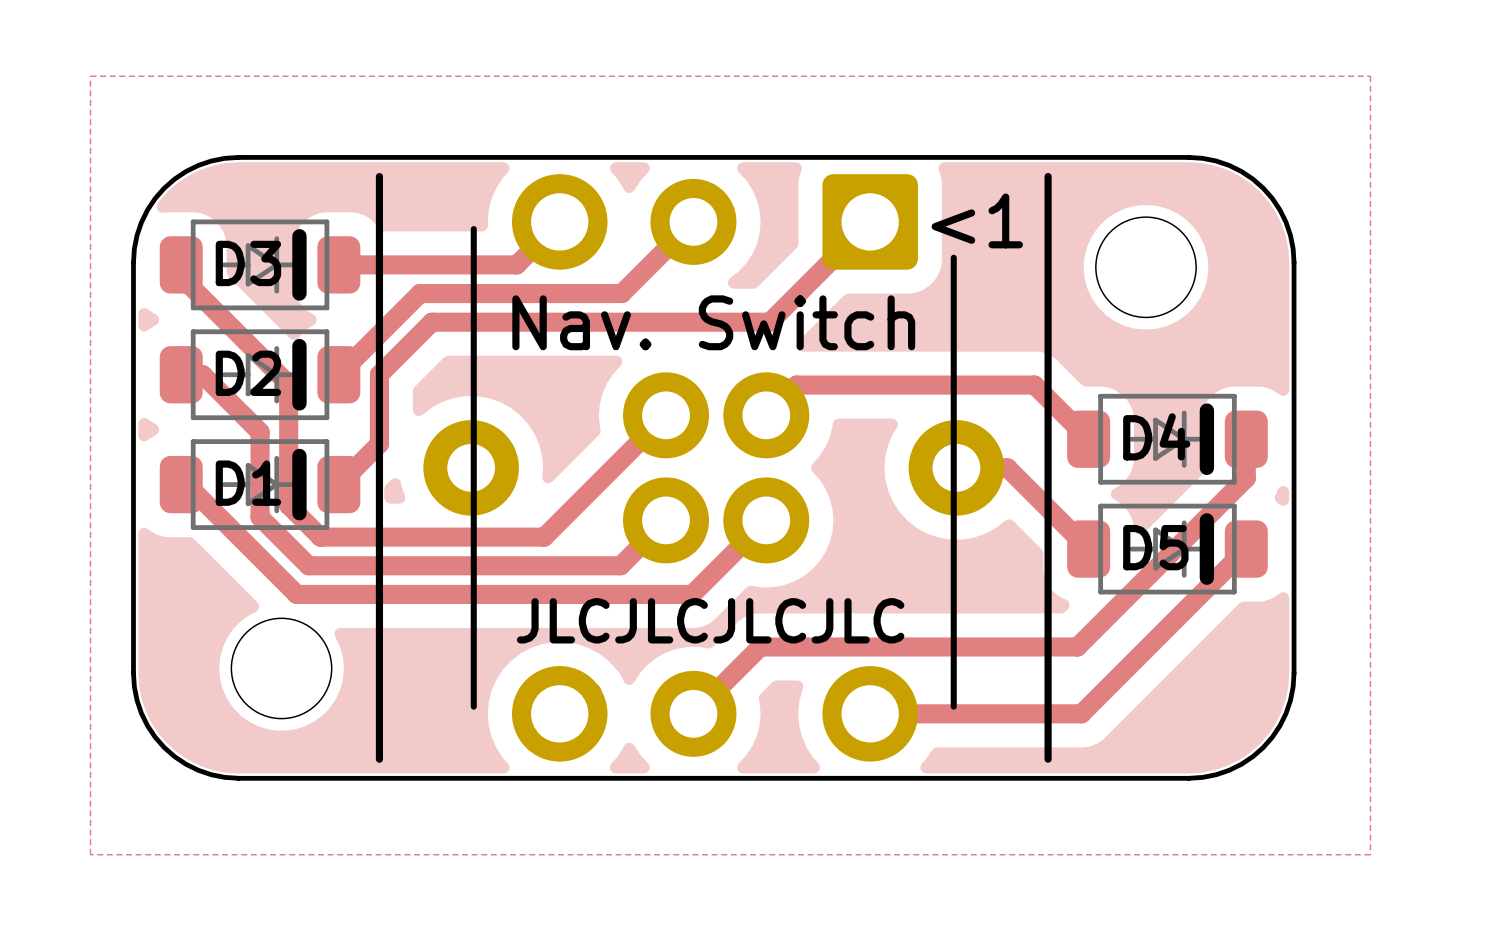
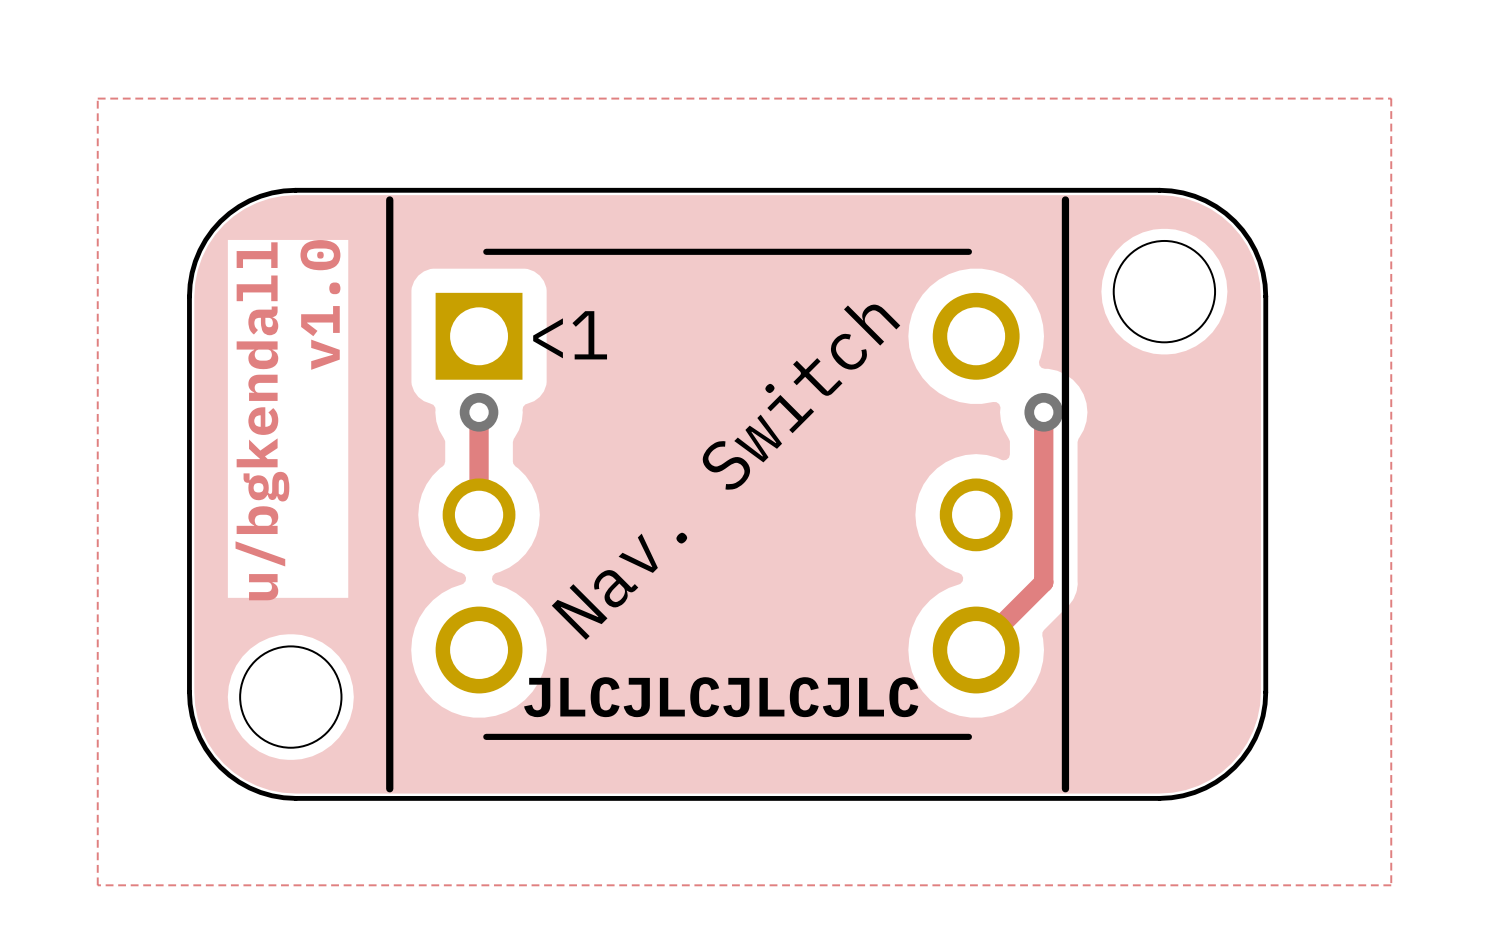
board edge: (238, 157) (1188, 157) (1216, 161) (1241, 171) (1263, 188) (1272, 198) (1286, 222) (1293, 248) (1294, 673) (1290, 700) (1279, 725) (1263, 747) (1241, 764) (1216, 774) (1188, 778) (238, 778) (211, 774) (186, 764) (174, 756) (155, 737) (141, 713) (134, 686) (134, 248) (137, 235) (147, 209) (164, 188) (186, 171) (198, 165) (211, 161) (238, 157) -> (295, 190) (260, 196) (229, 213) (212, 230) (199, 250) (190, 284) (190, 704) (195, 727) (205, 748) (220, 767) (239, 782) (260, 792) (295, 798) (1159, 798) (1183, 795) (1205, 787) (1225, 775) (1249, 748) (1263, 715) (1265, 692) (1265, 284) (1259, 261) (1249, 239) (1234, 221) (1216, 206) (1194, 196) (1159, 190) (295, 190)
track: (559, 221) (516, 264) (338, 264) -> none
track: (693, 221) (621, 293) (420, 293) (338, 374) -> none
track: (870, 221) (769, 322) (431, 322) (379, 374) (379, 443) (338, 484) -> none
D3: (260, 264) -> none
track: (181, 276) (288, 384) (288, 505) (320, 537) (544, 537) (666, 415) -> none
text: none -> v1.0 (320, 304)
text: none -> <1 (570, 335)
track: (181, 374) (202, 374) (260, 432) (260, 517) (308, 565) (620, 565) (666, 520) -> none
D2: (260, 374) -> none
track: none -> (479, 412) (479, 514)
via: none -> (479, 412)
track: none -> (1043, 412) (1043, 582) (976, 650)
via: none -> (1043, 412)
text: none -> u/bgkendall (262, 421)
track: (766, 415) (796, 385) (1034, 385) (1088, 439) -> none
D4: (1167, 439) -> none
track: (1246, 439) (1246, 478) (1077, 646) (760, 646) (693, 713) -> none
part: (713, 467) -> none
part: (713, 467) -> none
part: none -> (727, 494)
track: (956, 467) (1007, 467) (1088, 549) -> none
track: (181, 484) (186, 484) (296, 594) (692, 594) (766, 520) -> none
D1: (260, 484) -> none
D5: (1167, 549) -> none
track: (1246, 549) (1081, 713) (870, 713) -> none
text position: JLCJLCJLCJLC (710, 620) -> JLCJLCJLCJLC (721, 697)

